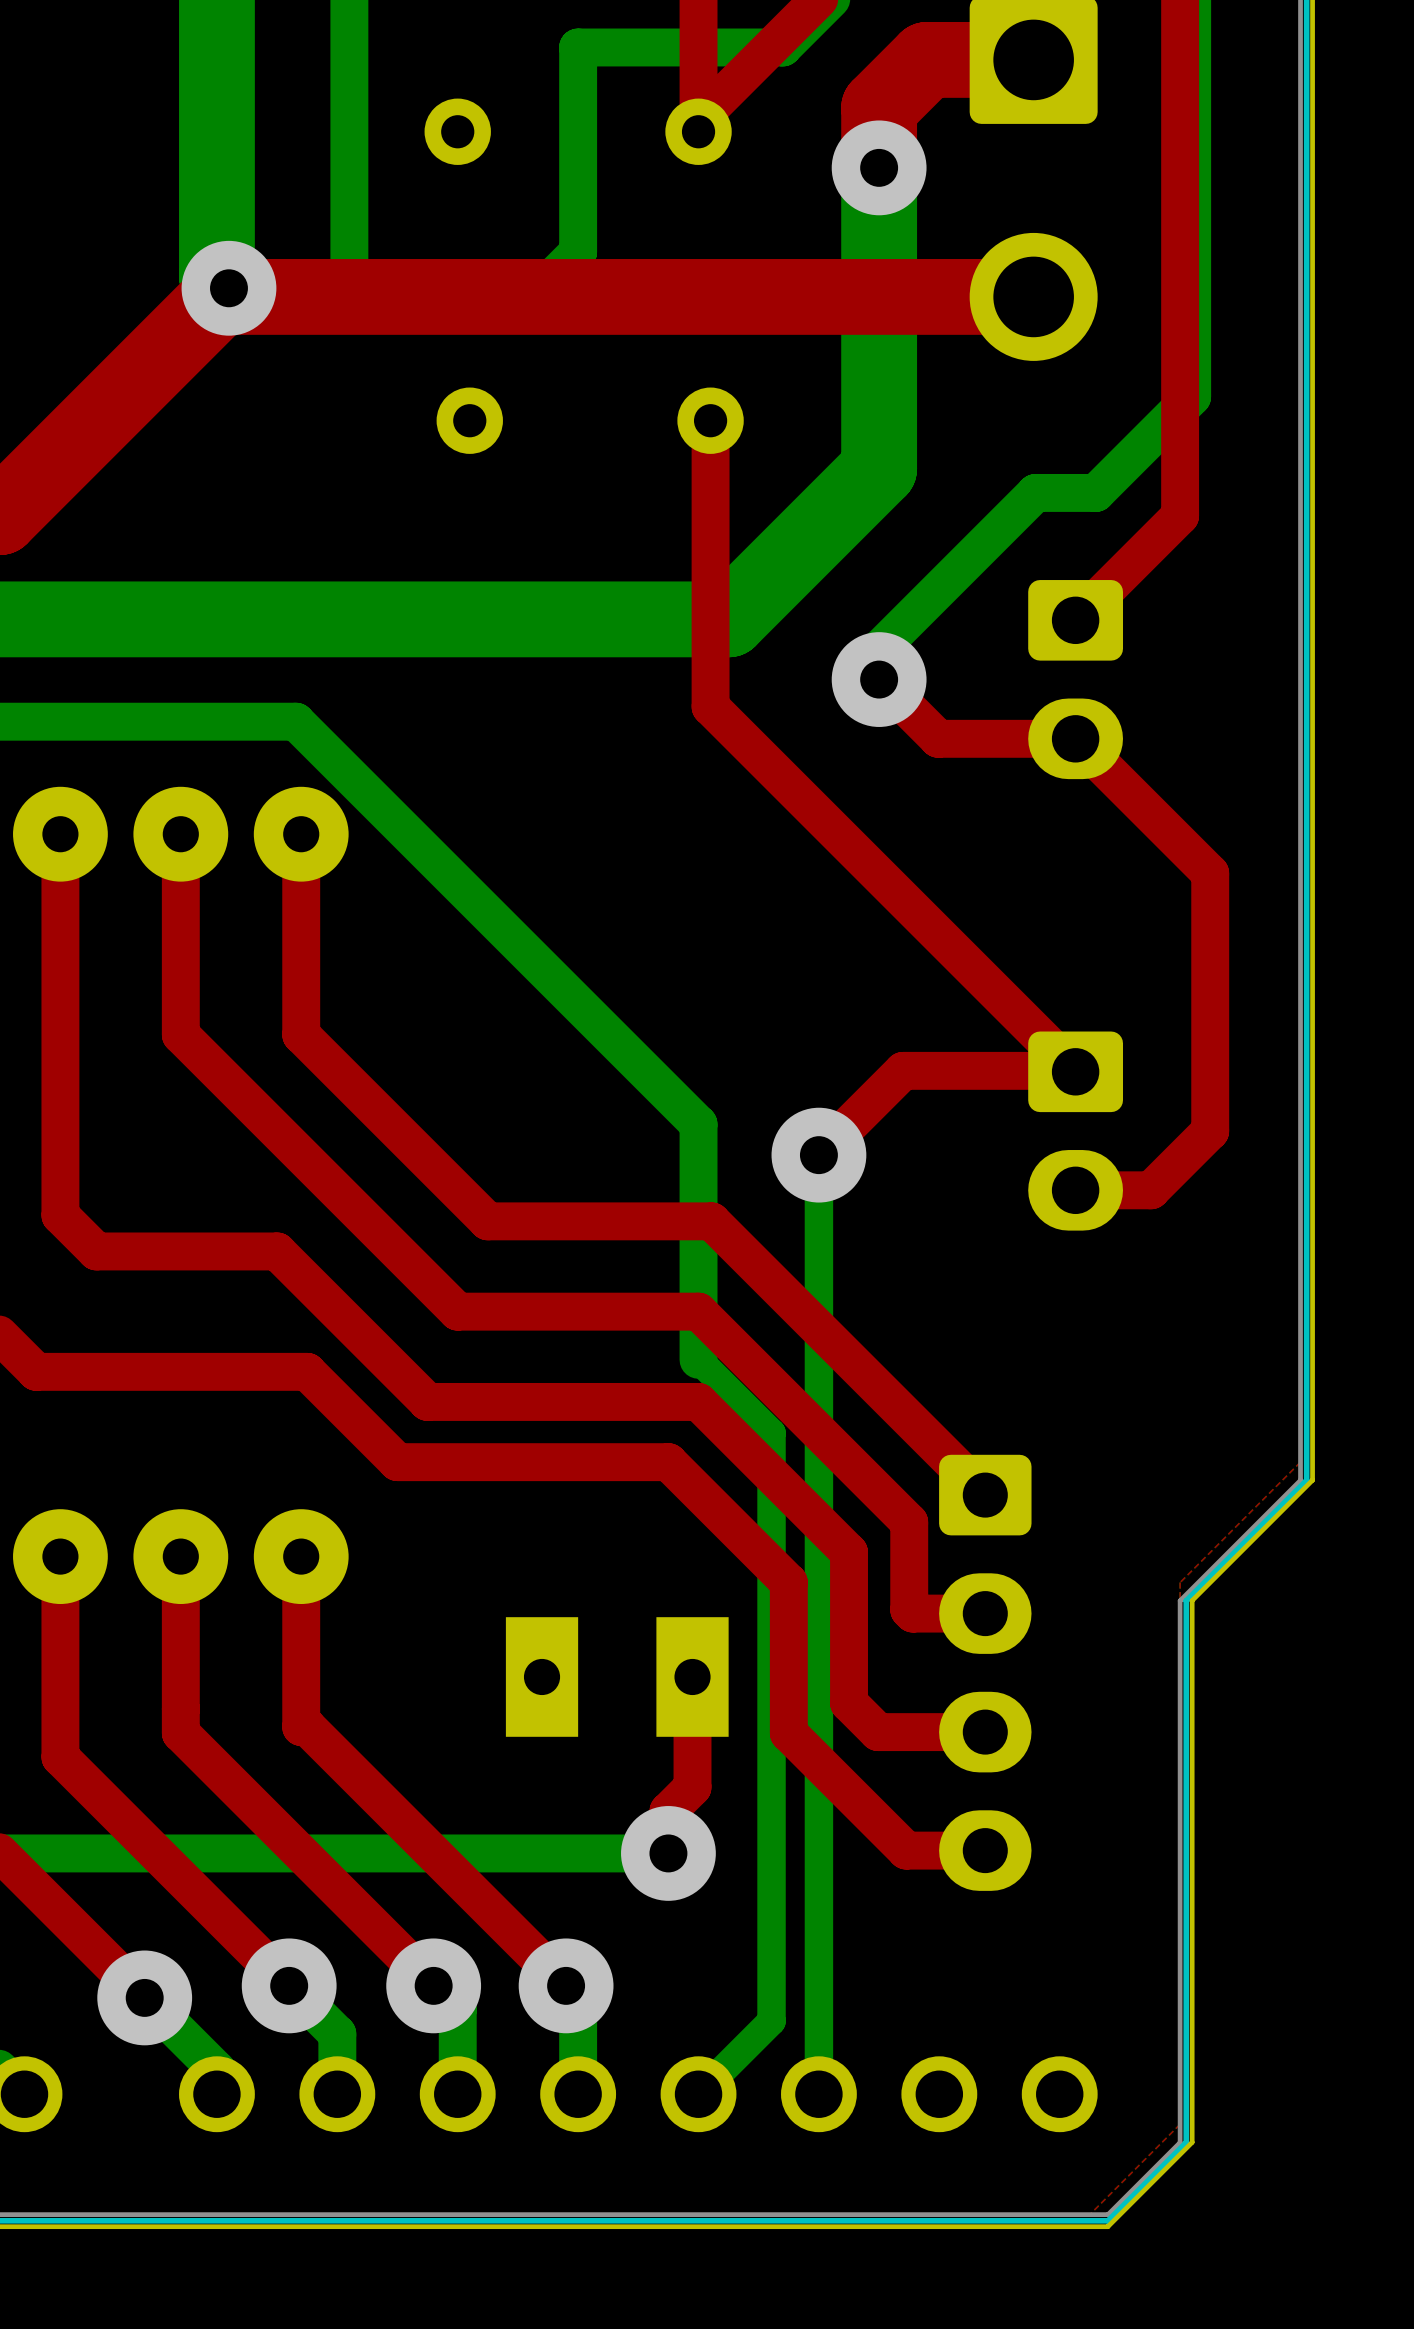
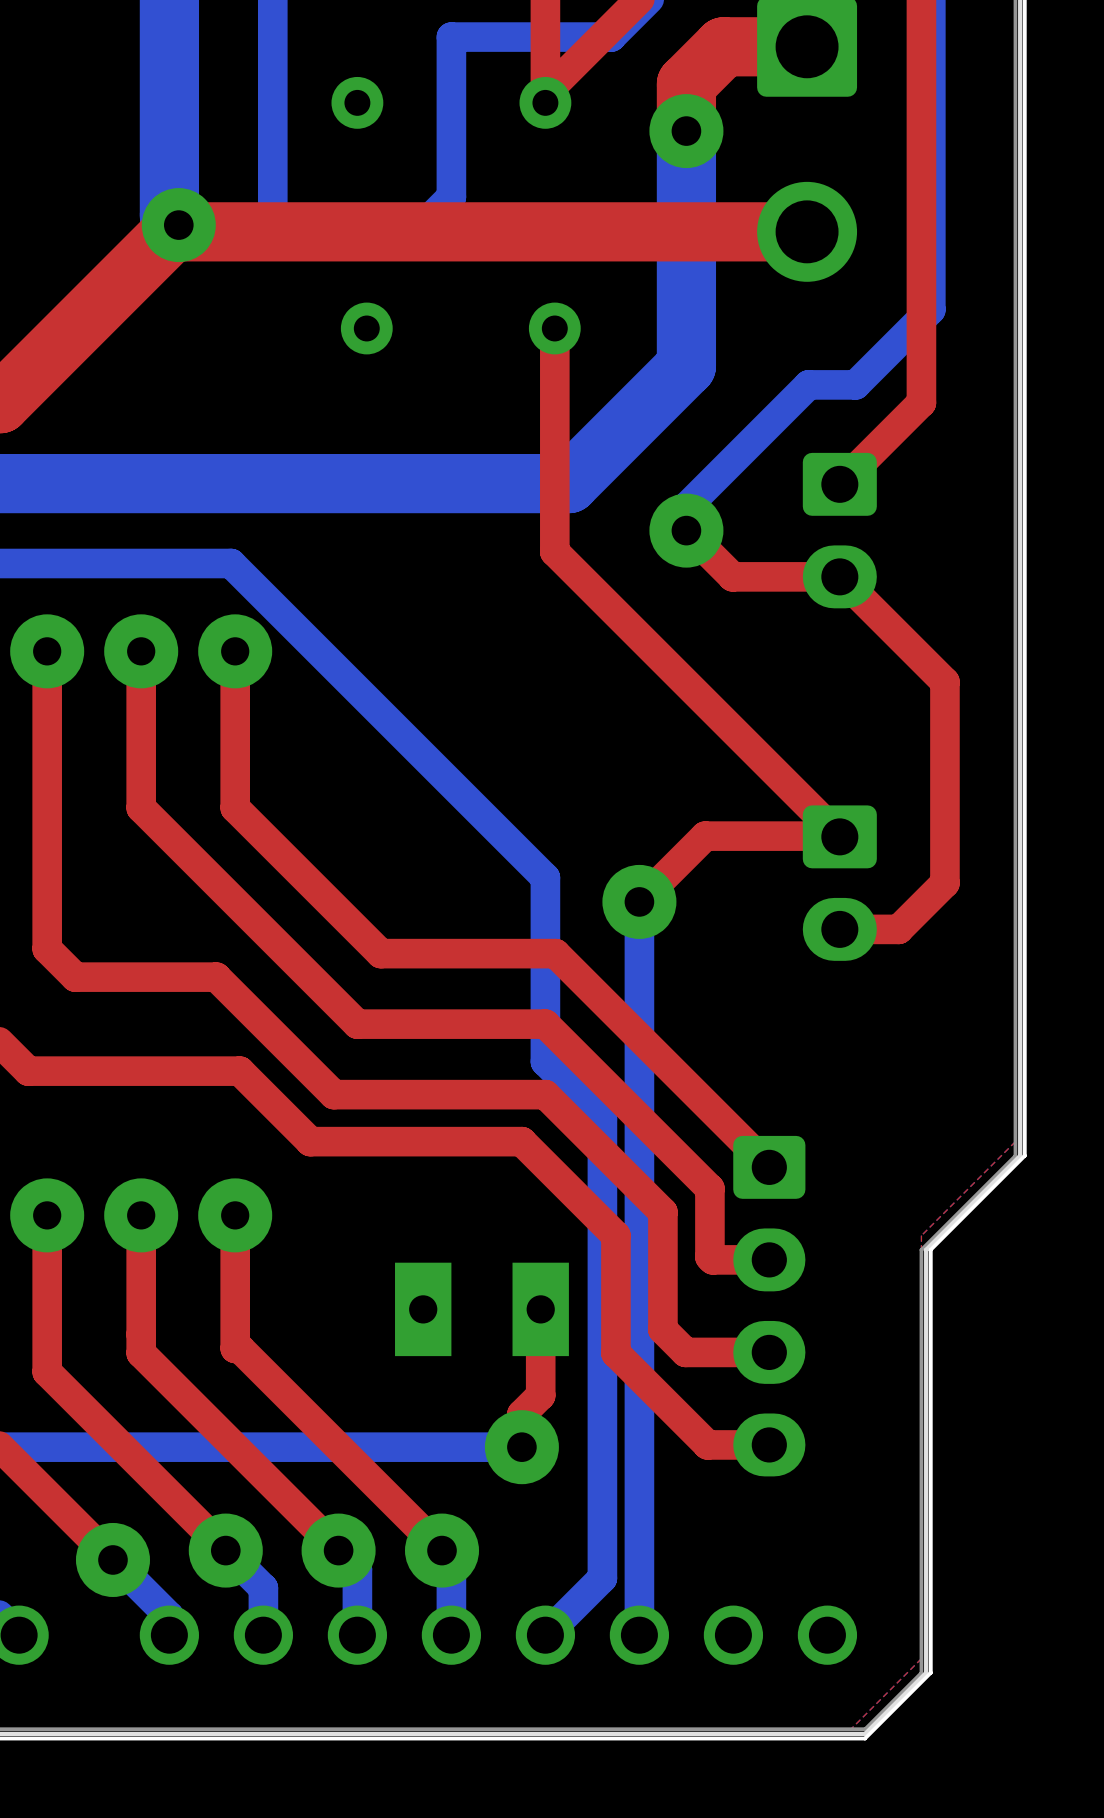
bottom track width: thin (818, 1179) (818, 2094) -> thick (639, 920) (639, 1635)
bottom track width: thin (698, 1359) (771, 1432) (771, 2021) (698, 2094) -> thick (545, 1061) (602, 1118) (602, 1578) (545, 1635)

